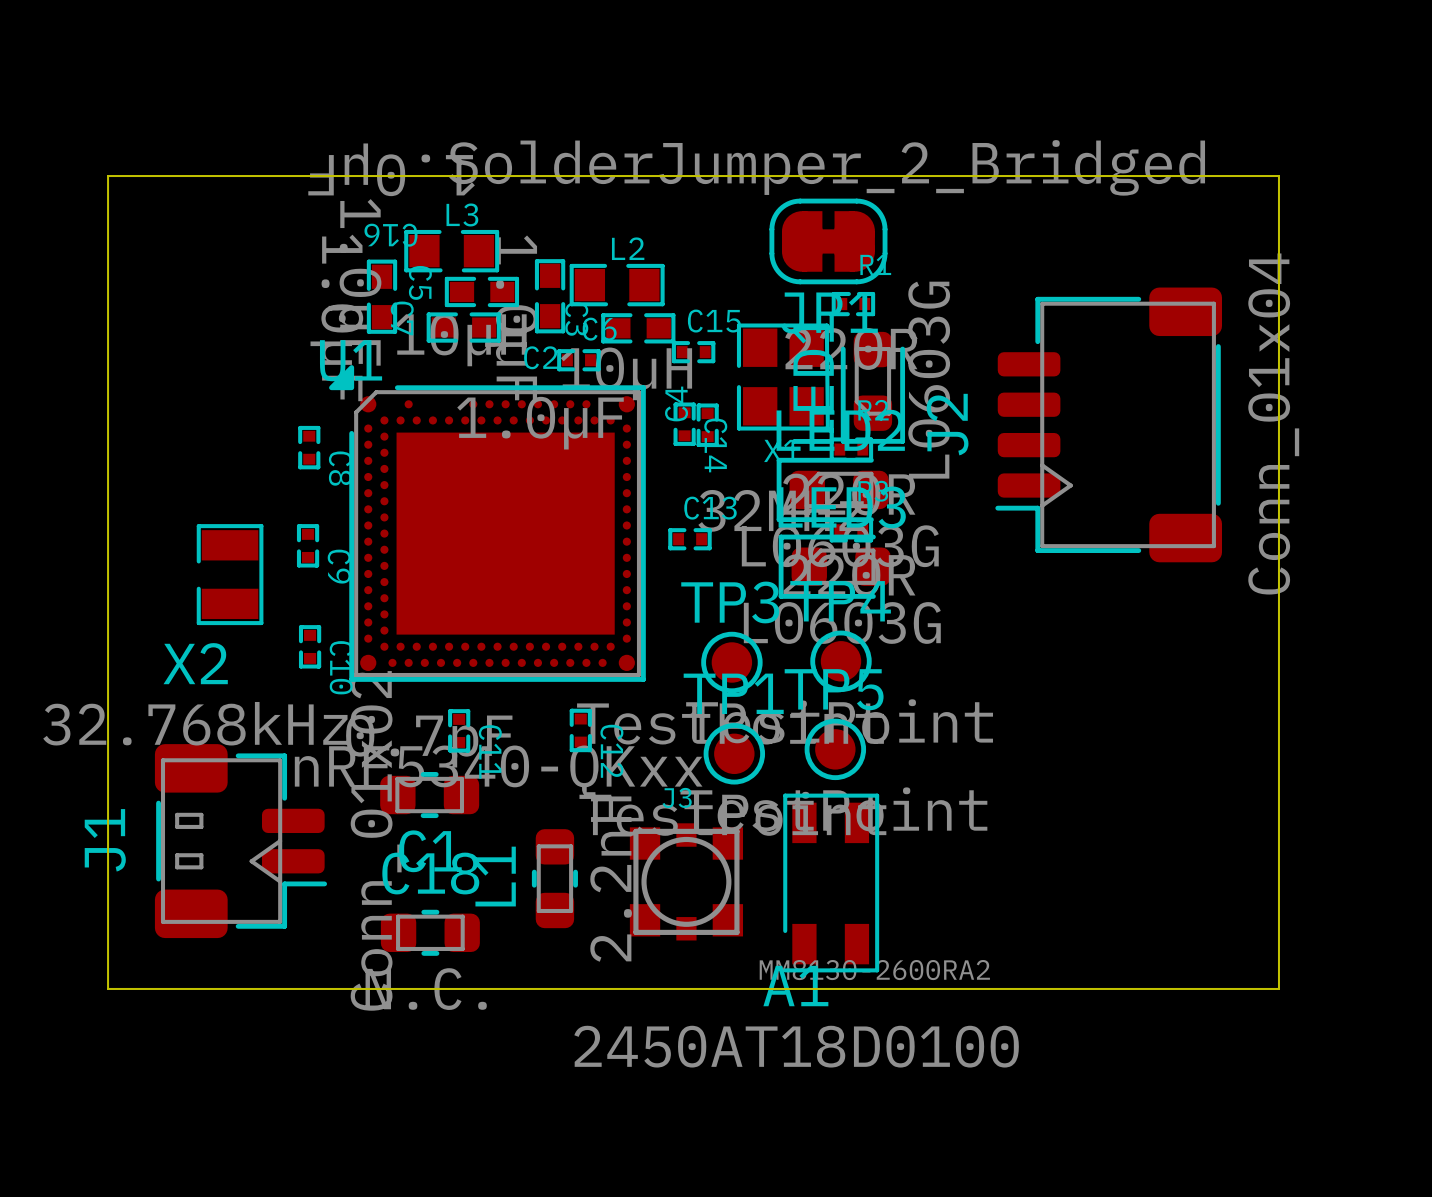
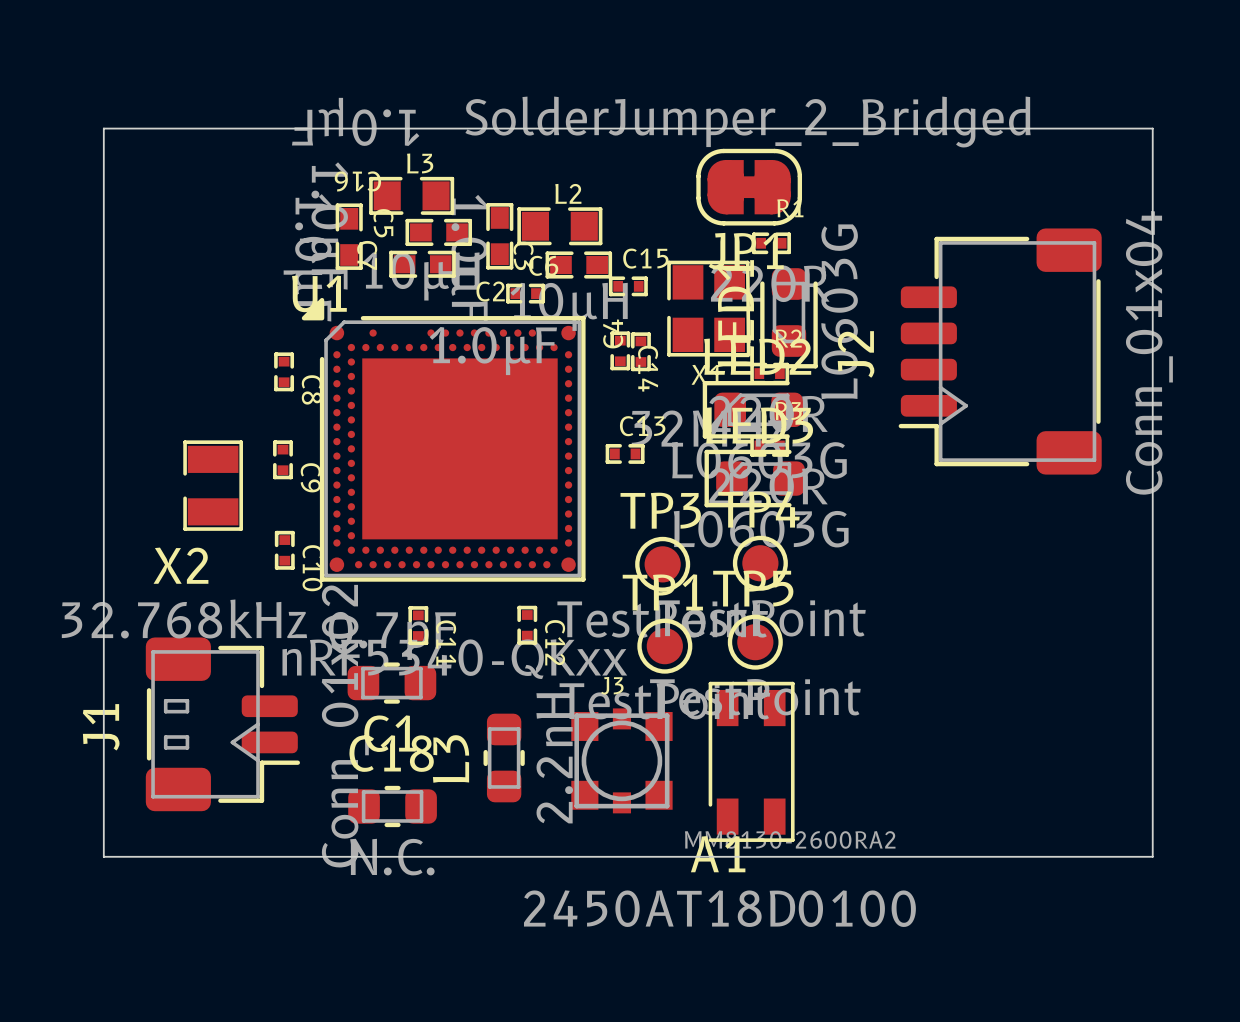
L1 name: L1 (495, 876) -> L3 (451, 758)

